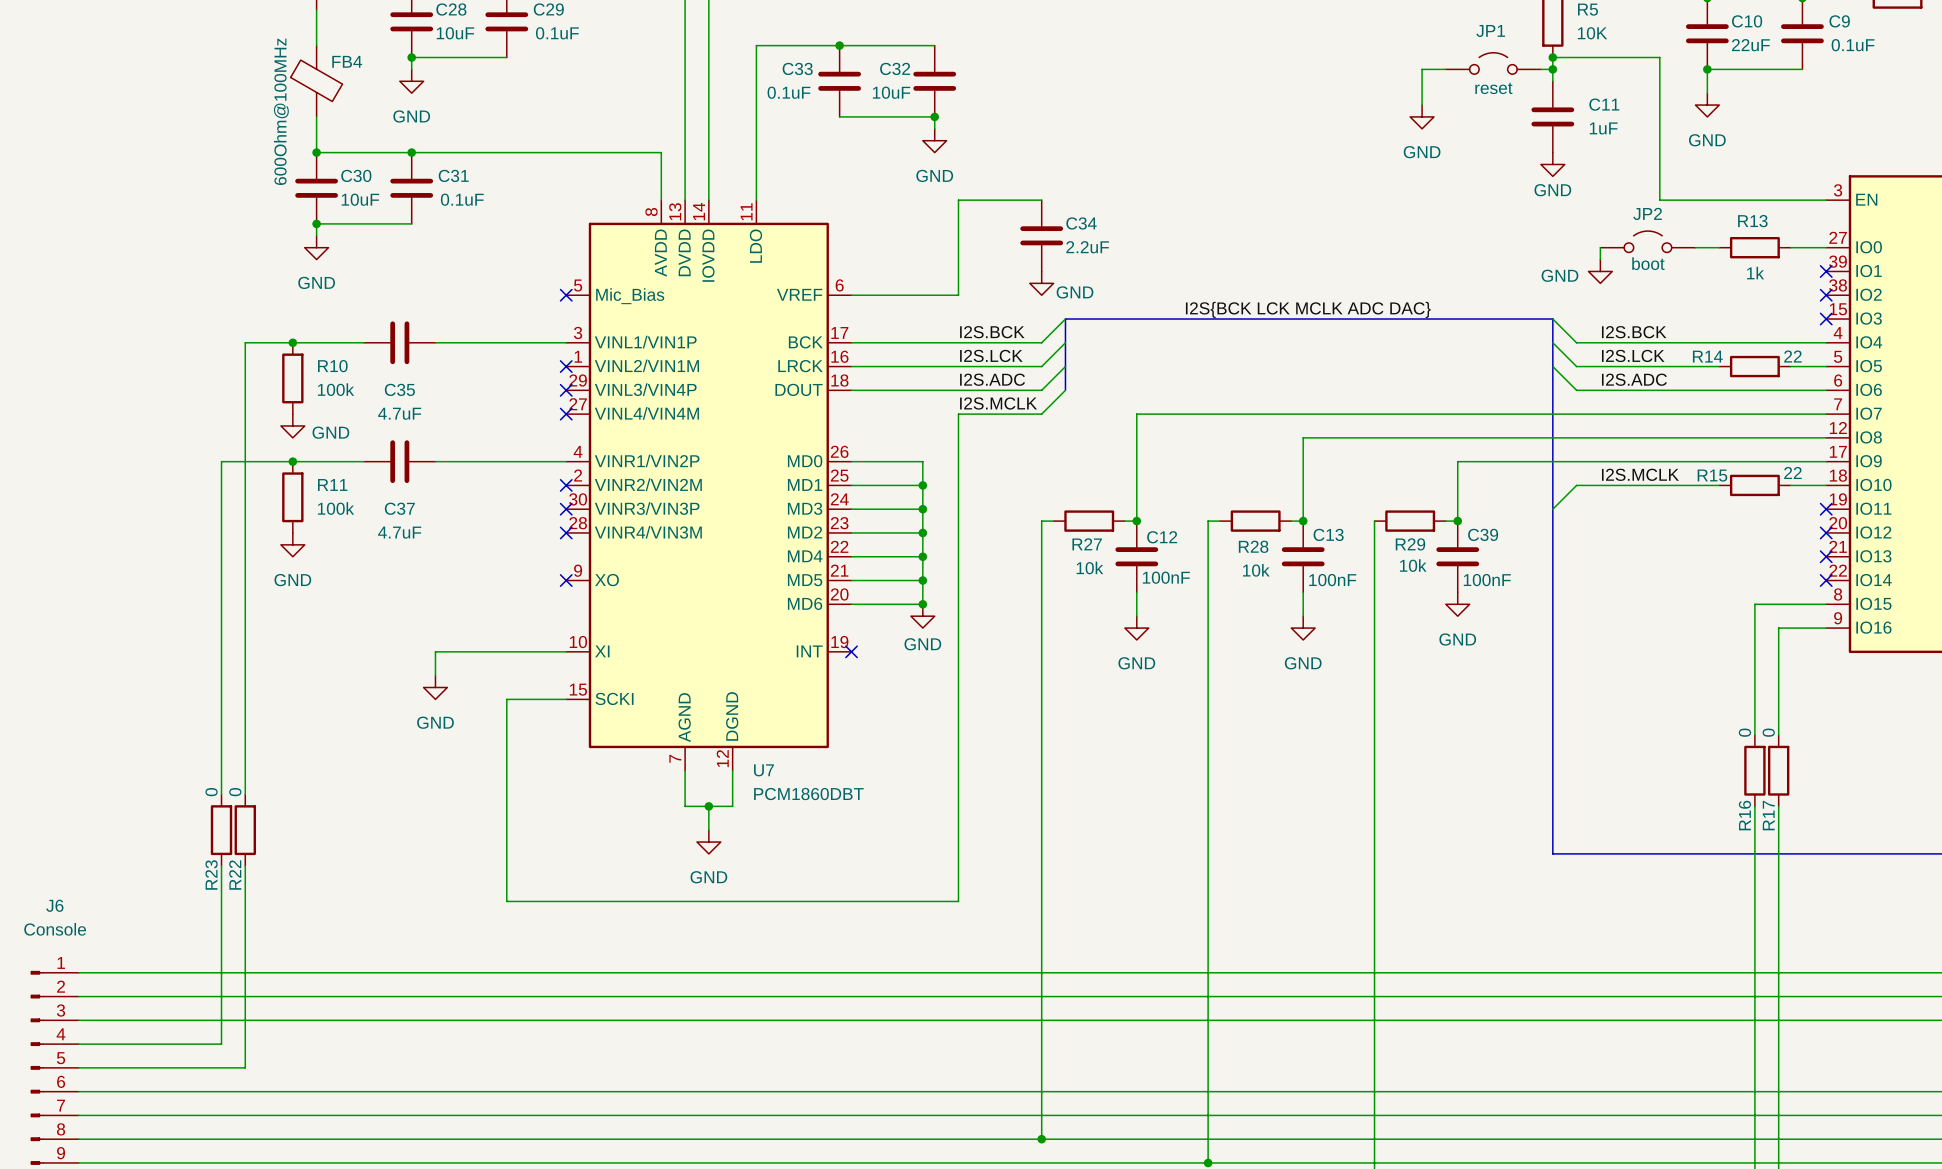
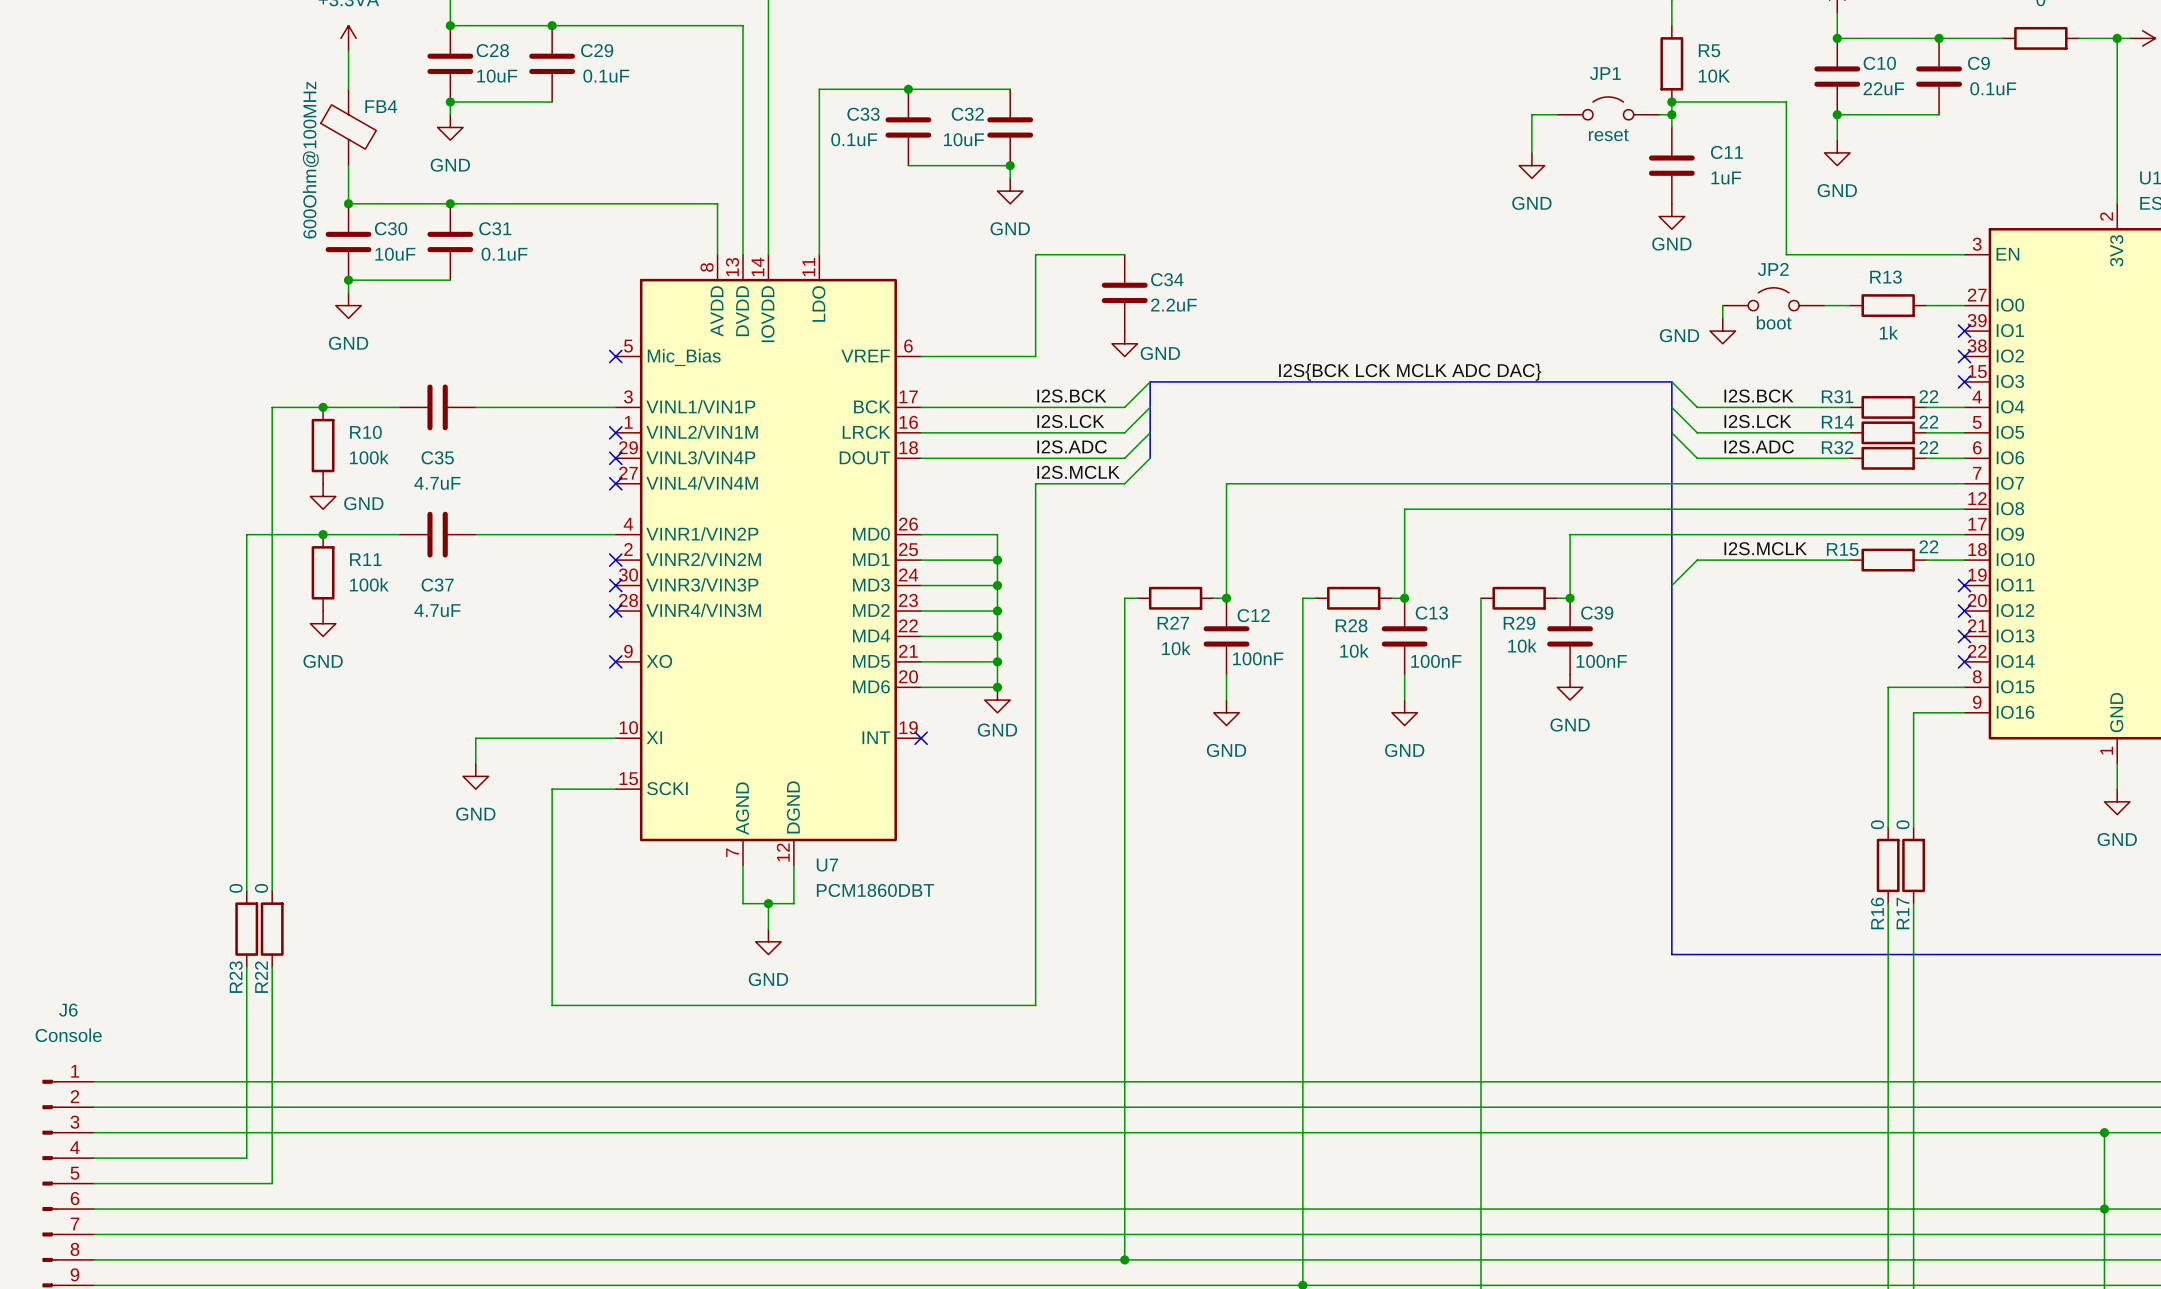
wire: (1719, 342) (1790, 342) -> none
R31: none -> 22 (1888, 407)
wire: (1719, 390) (1790, 390) -> none
R32: none -> 22 (1888, 458)

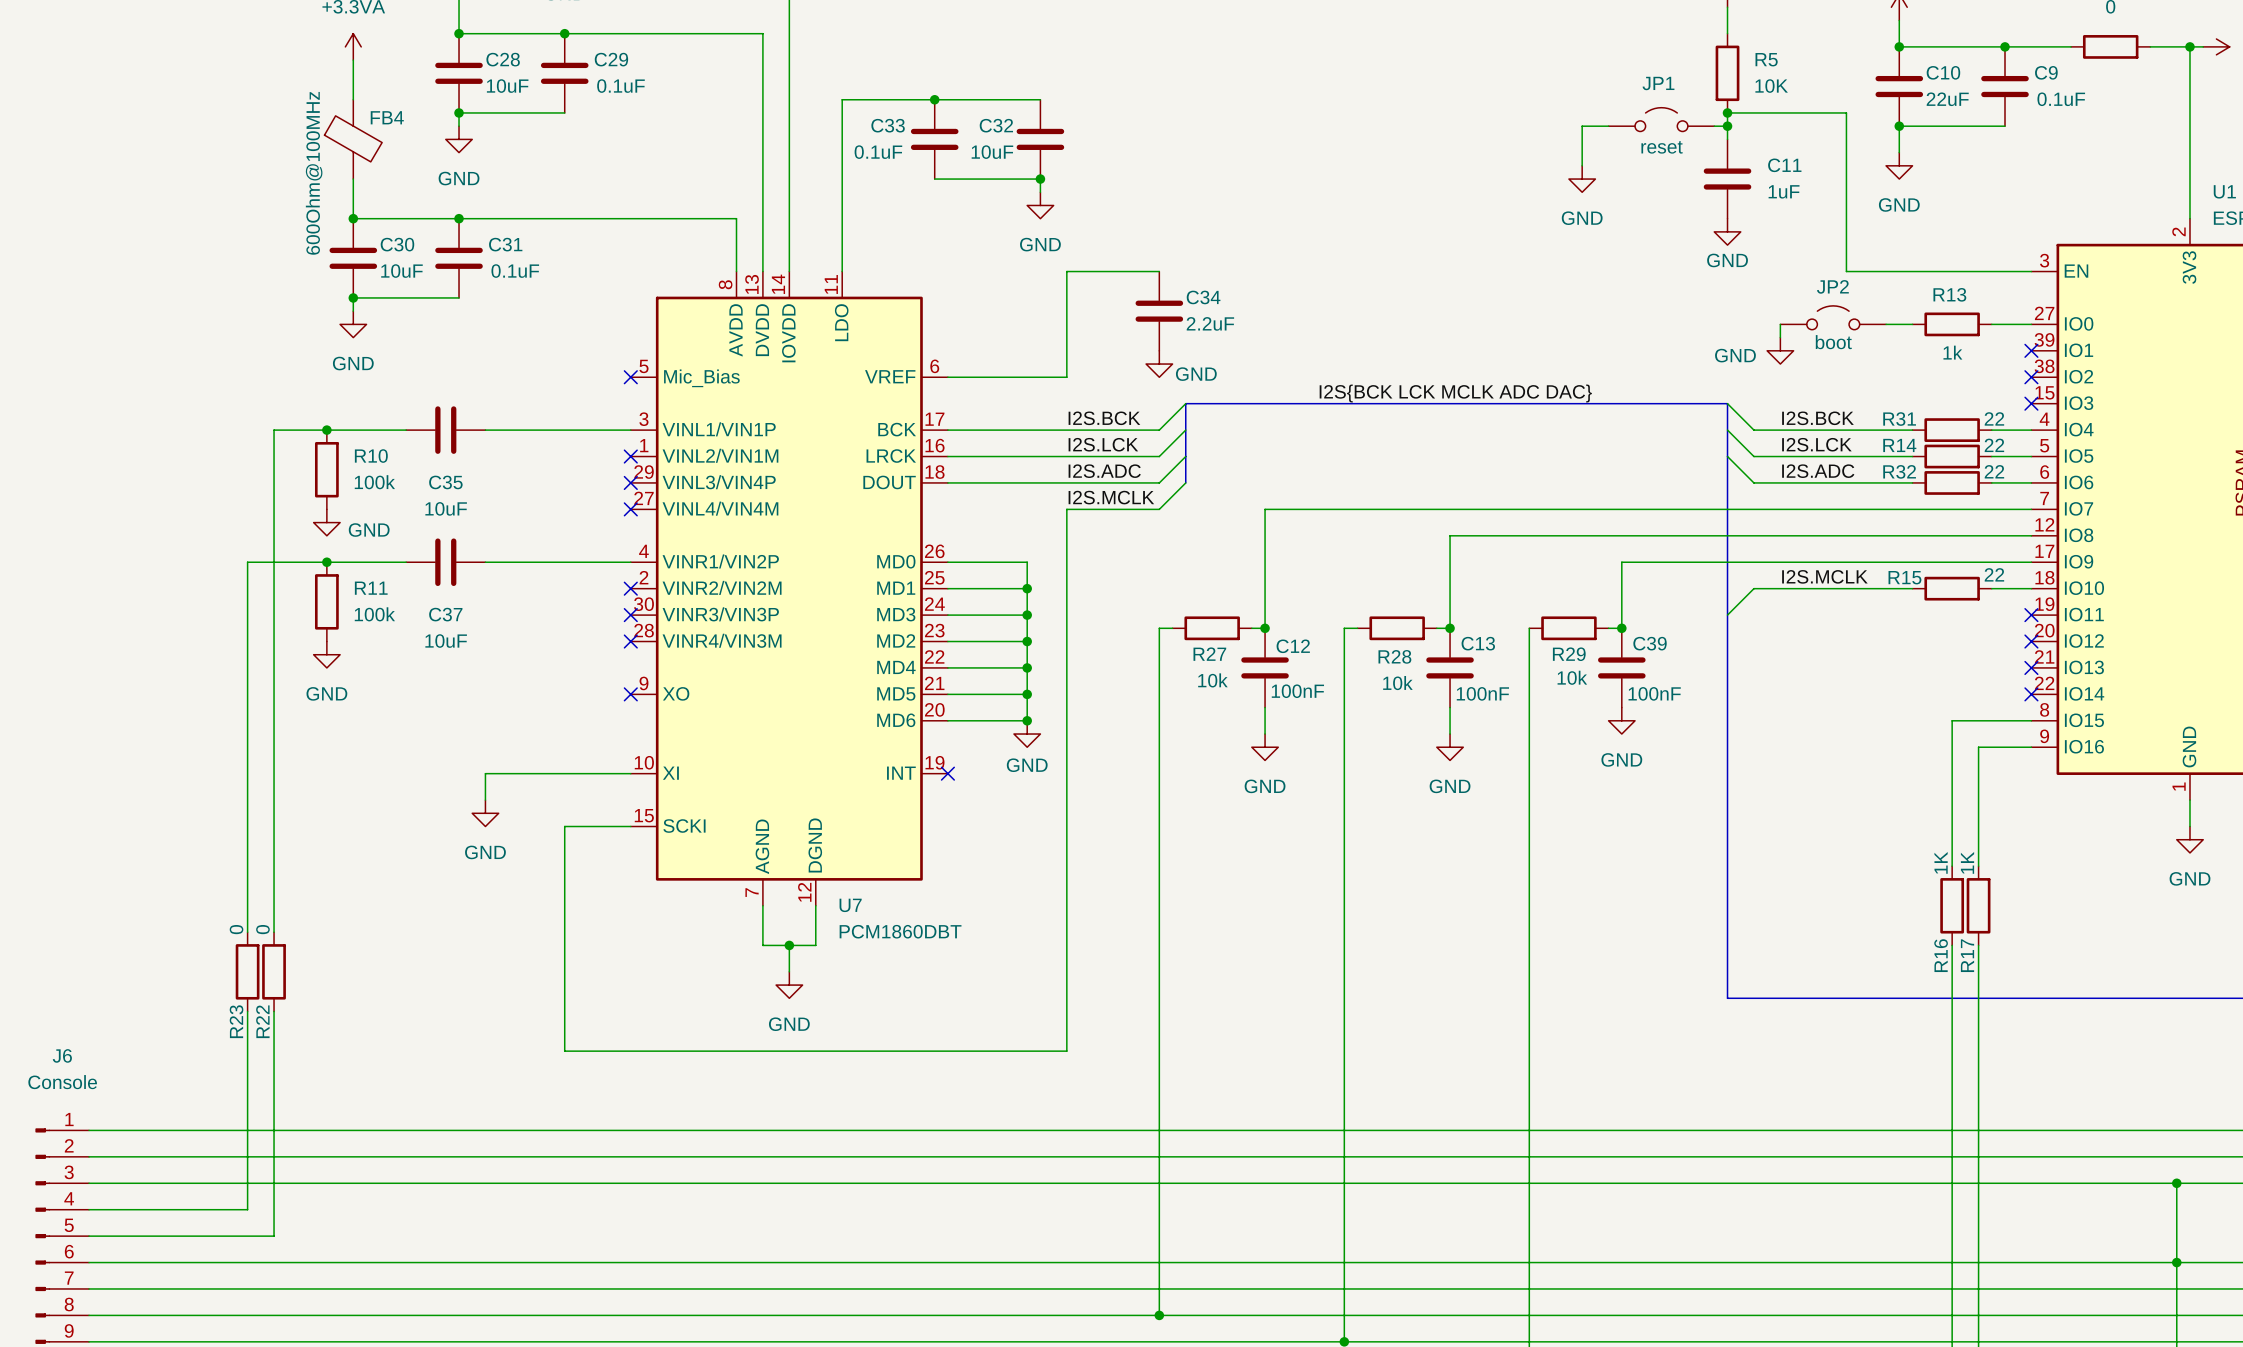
C35 value: 4.7uF (437, 483) -> 10uF (446, 508)
C37 value: 4.7uF (437, 610) -> 10uF (446, 641)
R16 value: 0 (1877, 824) -> 1K (1941, 862)
R17 value: 0 (1902, 824) -> 1K (1967, 862)

